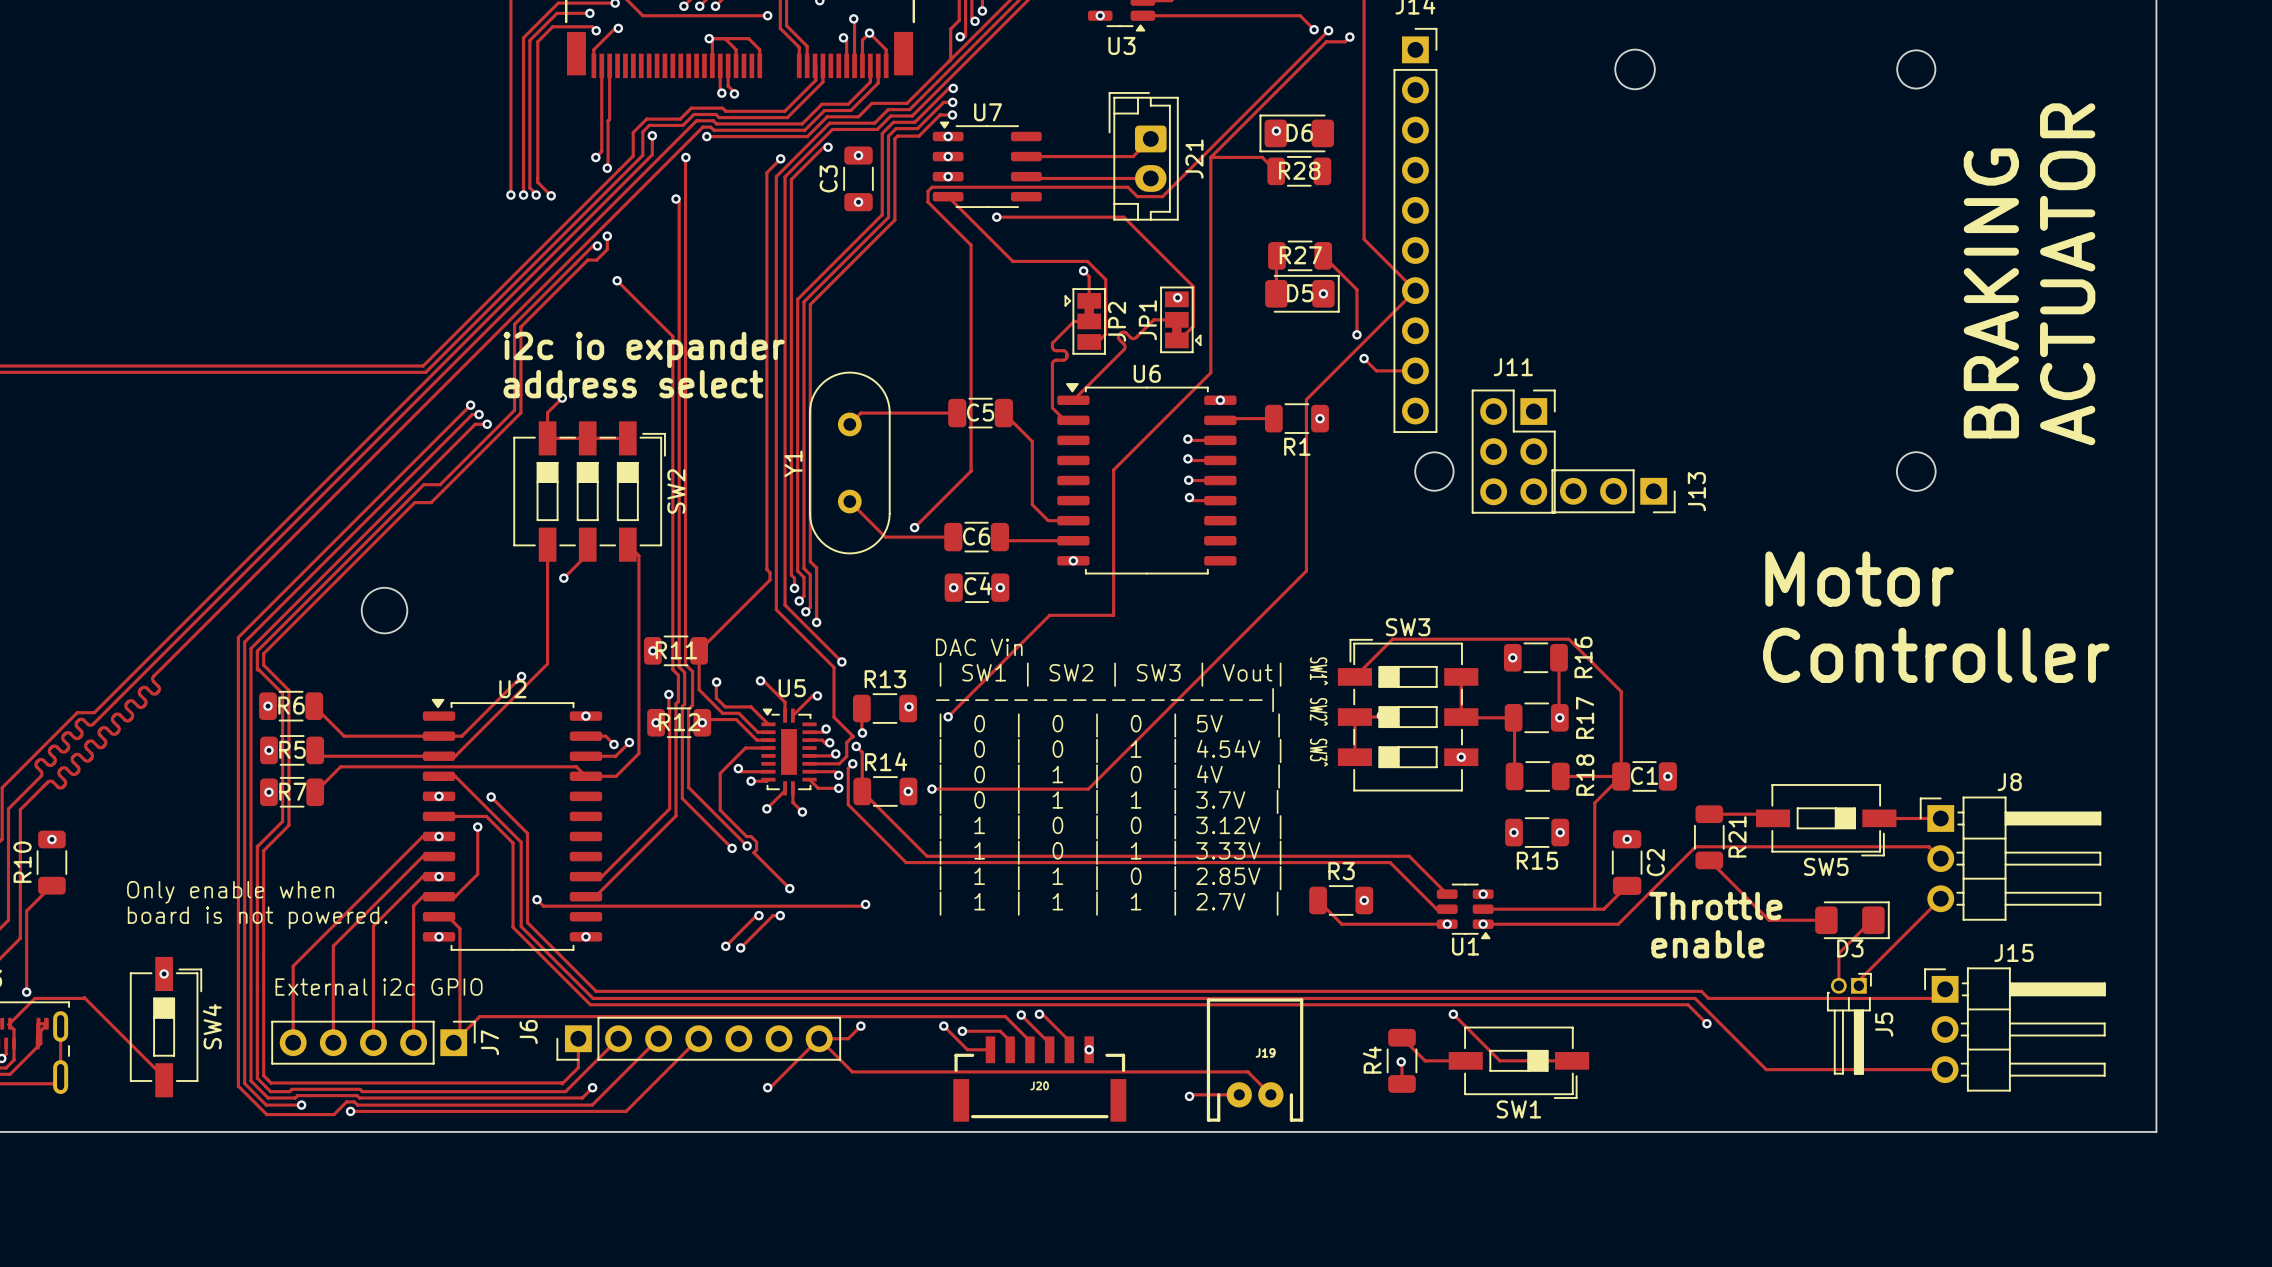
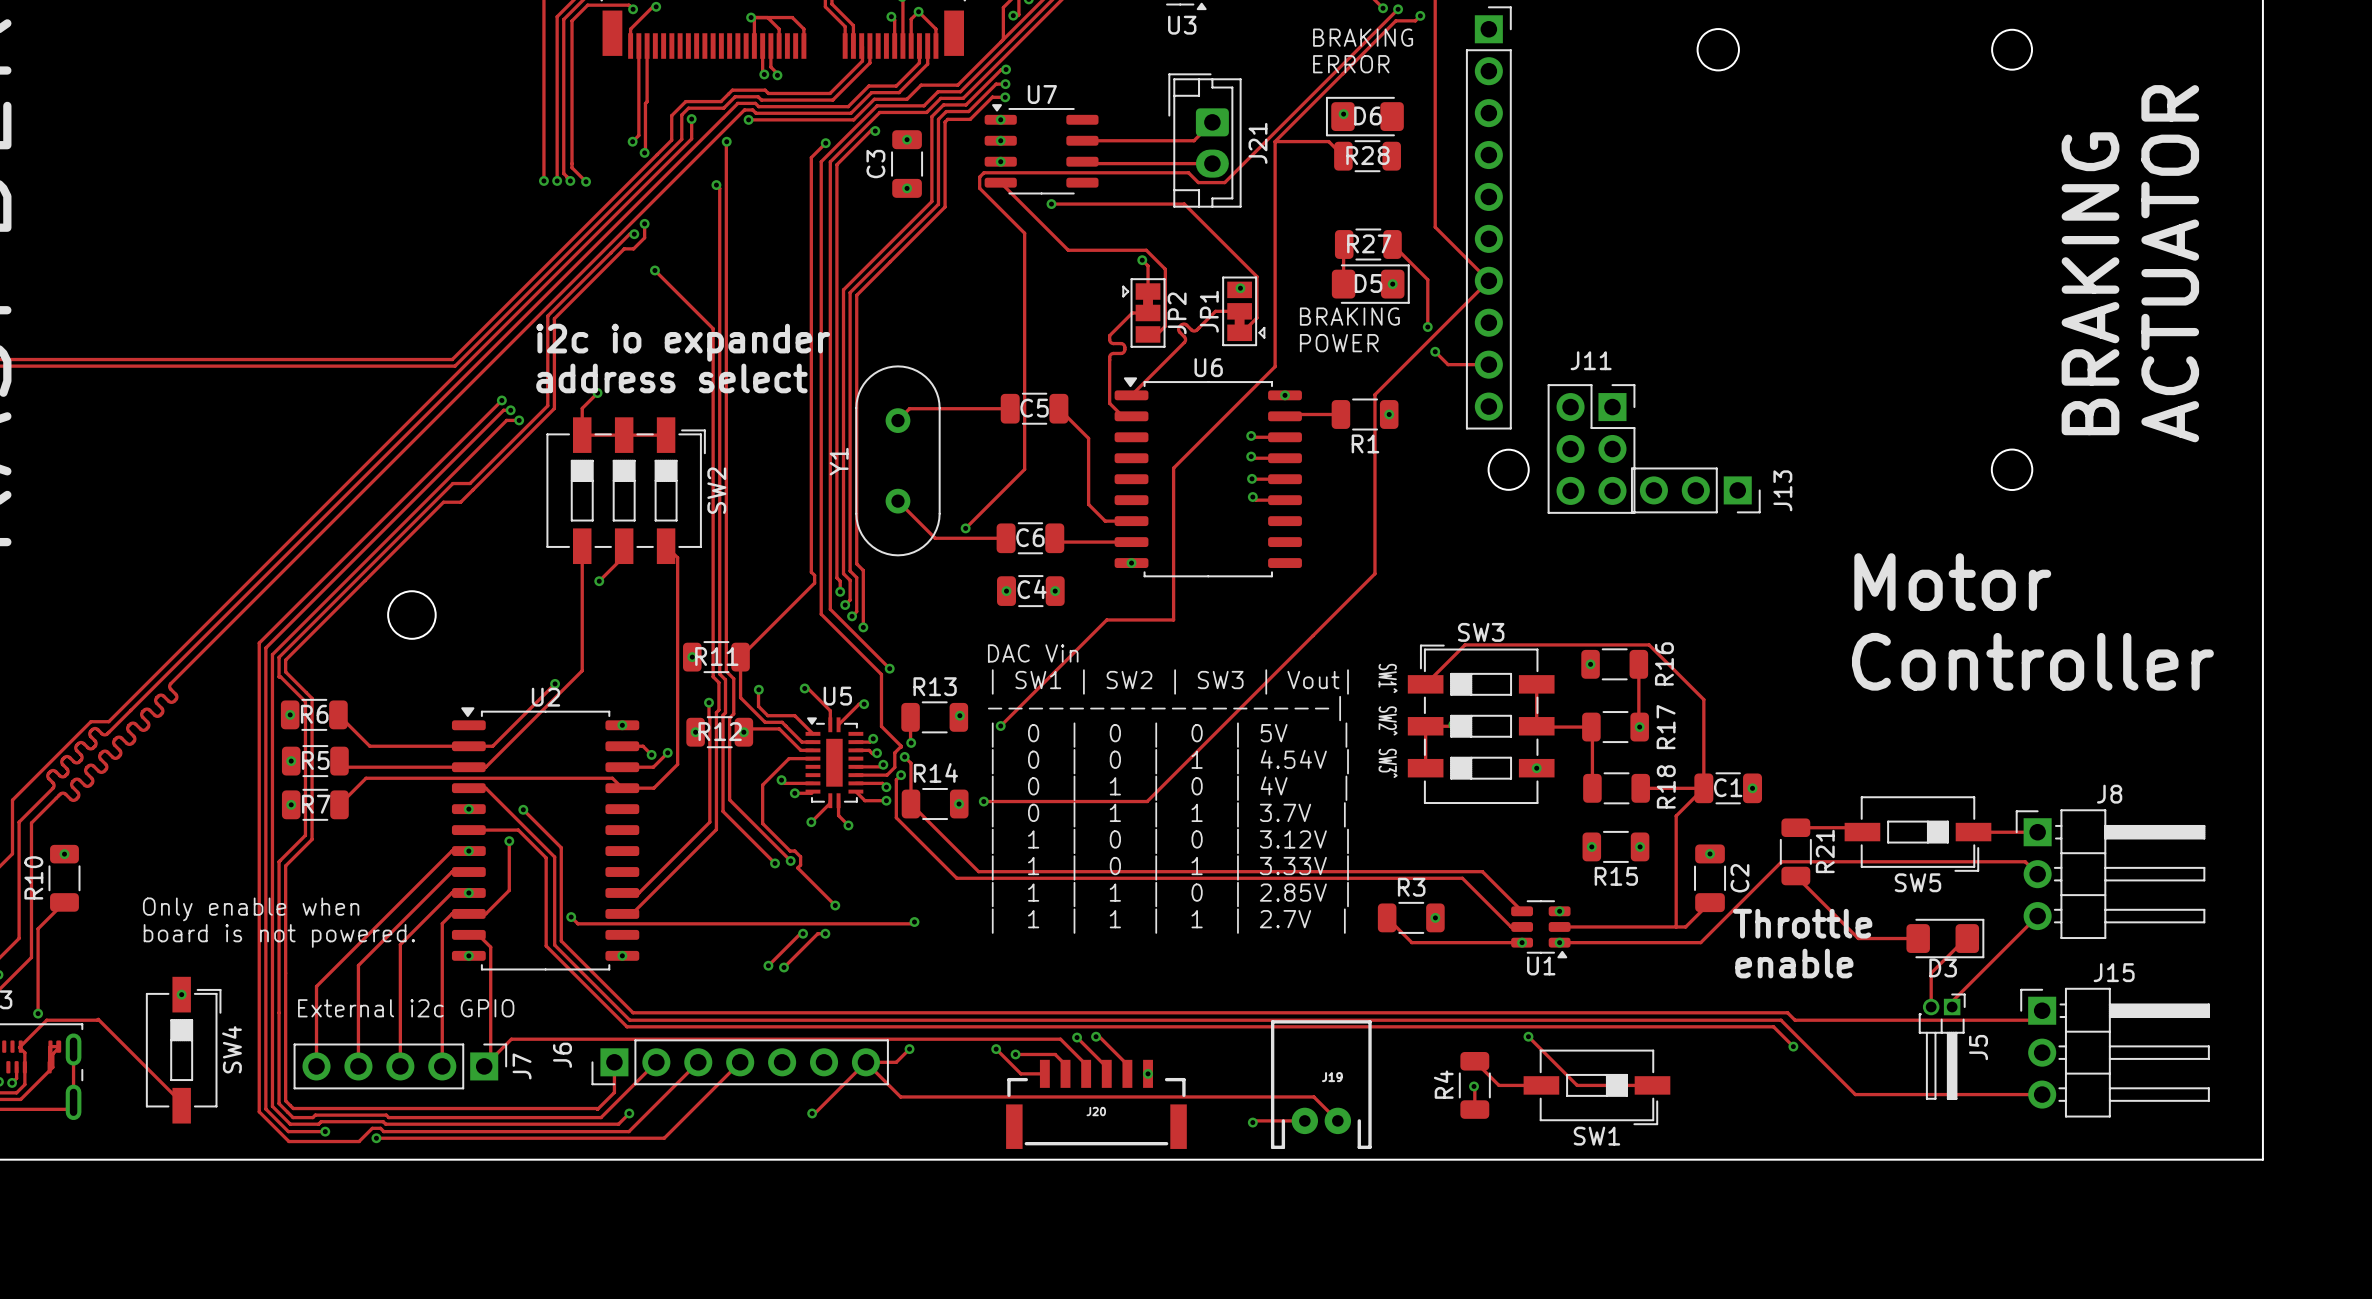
text: none -> BRAKING (1363, 37)
text: none -> ERROR (1351, 64)
text: none -> BRAKING (1349, 316)
text: none -> POWER (1339, 343)

